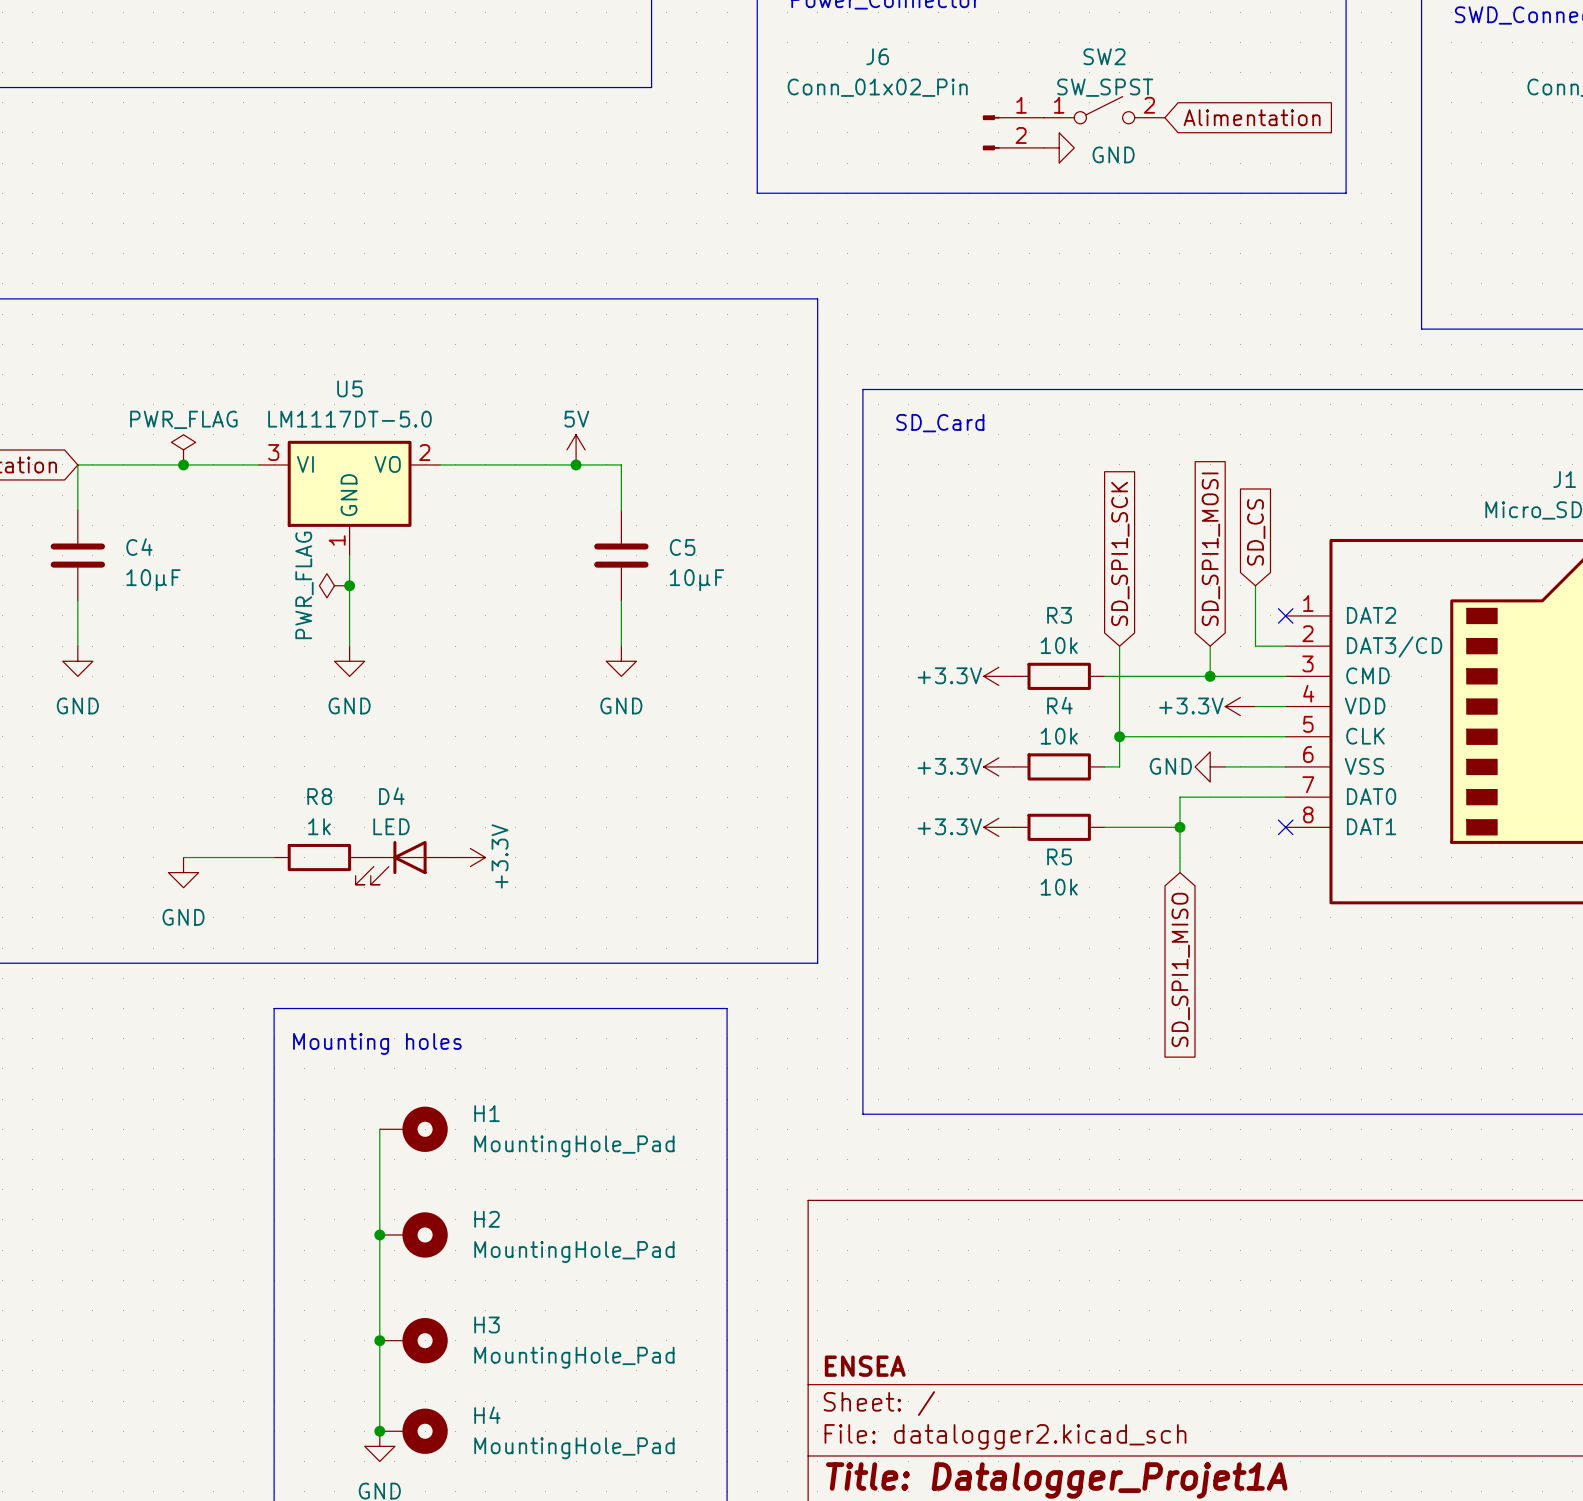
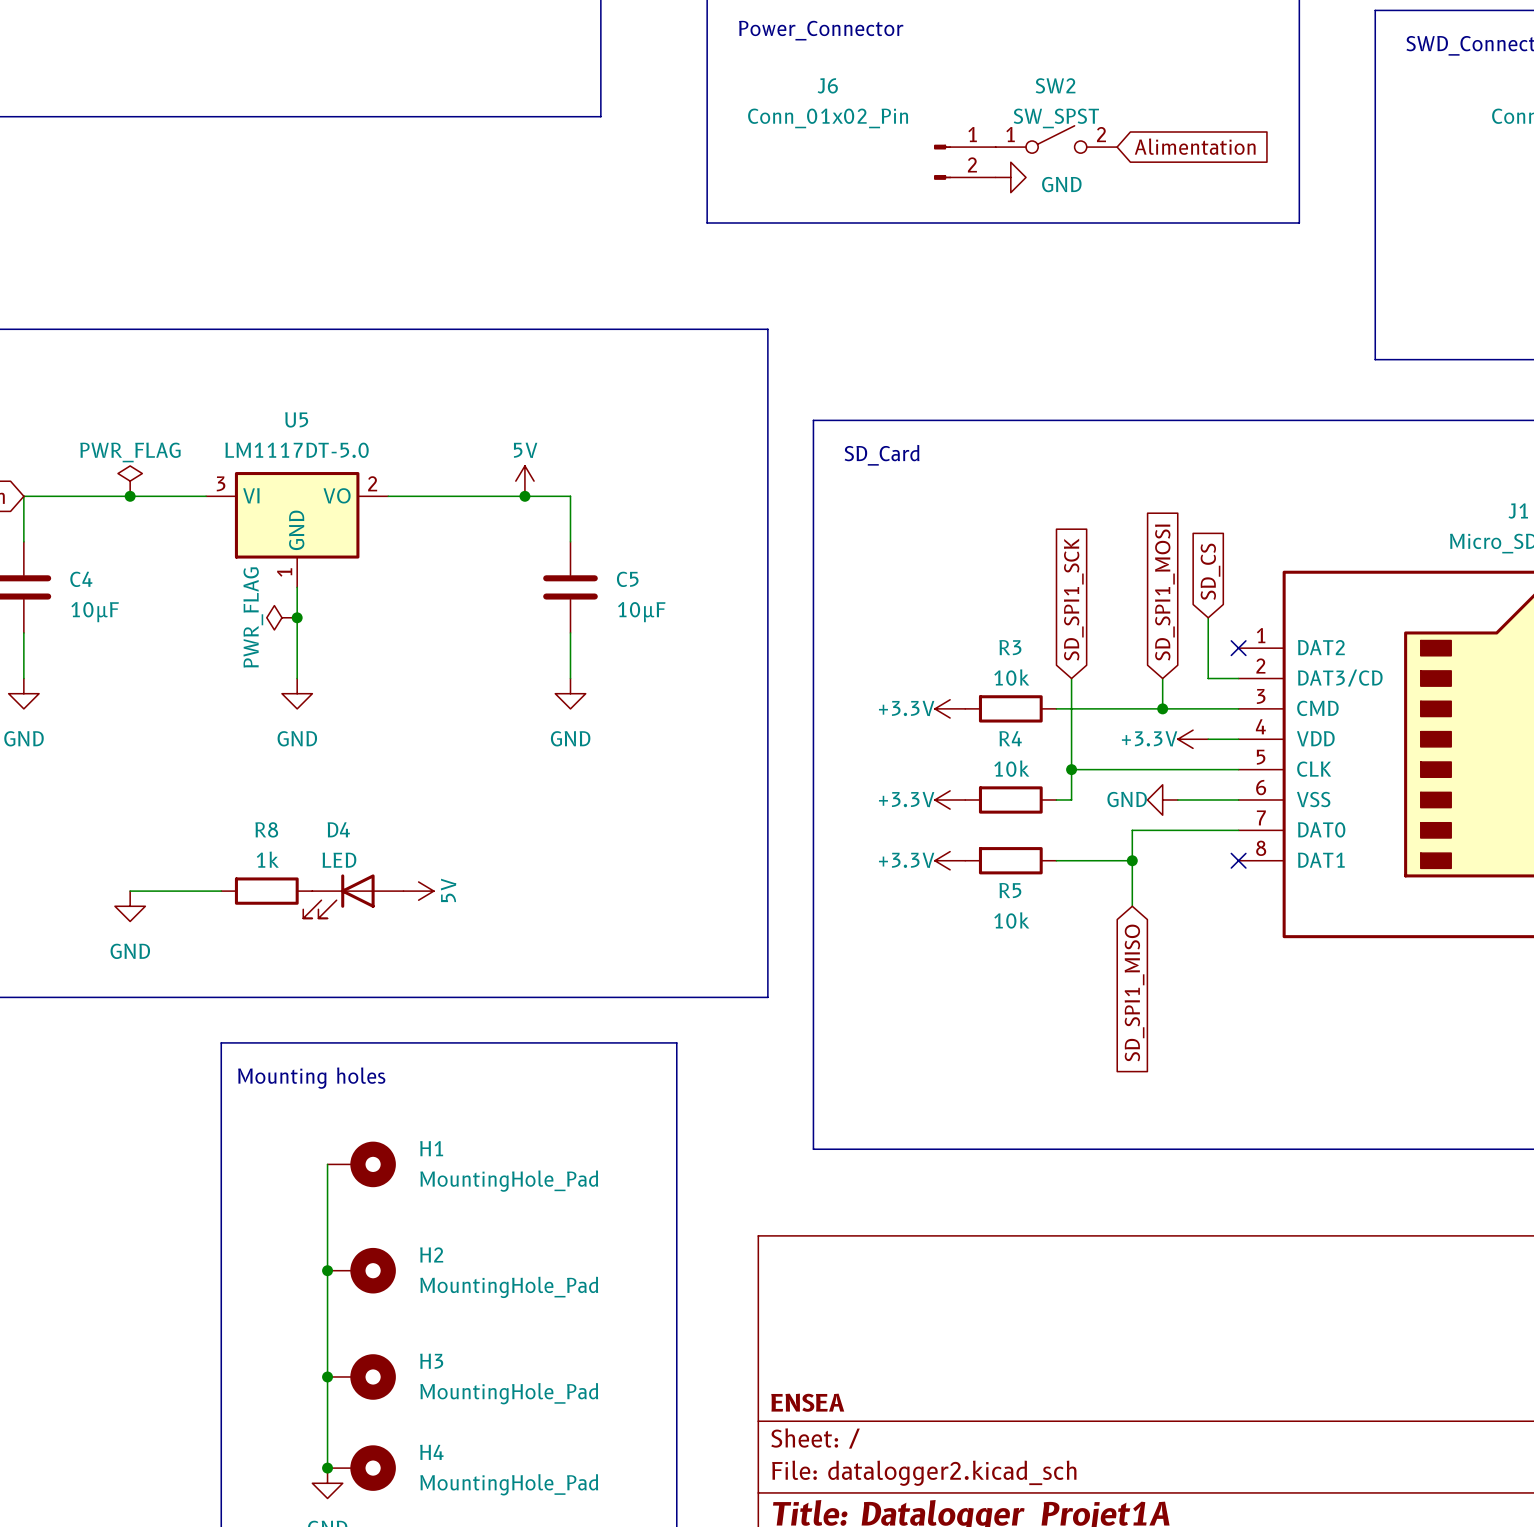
power symbol: +3.3V (470, 857) -> 5V (418, 891)

